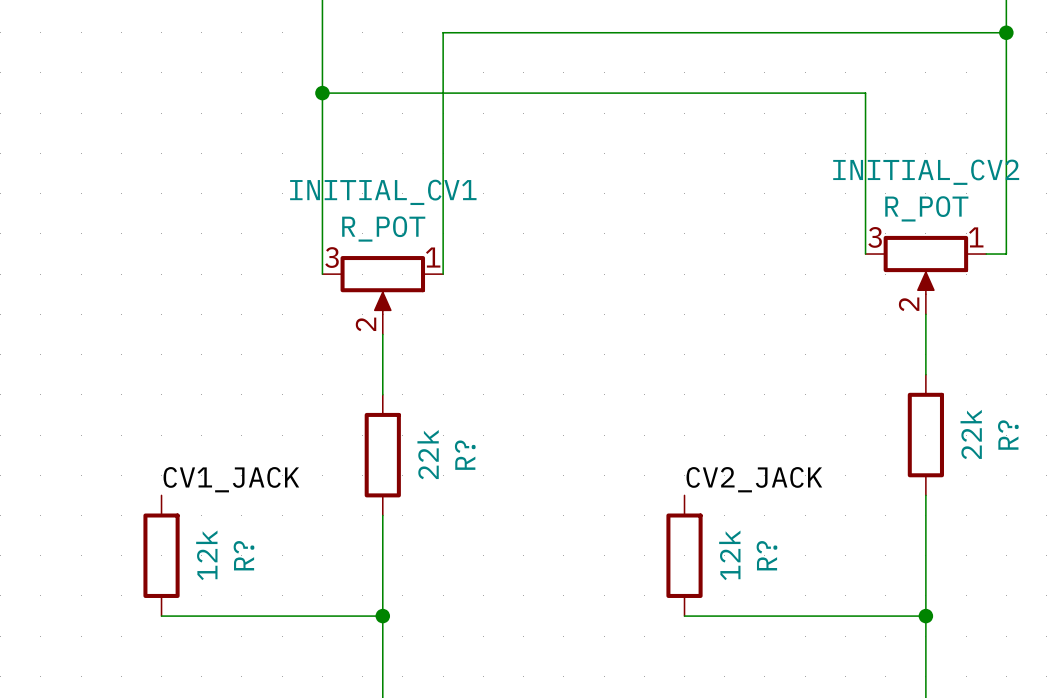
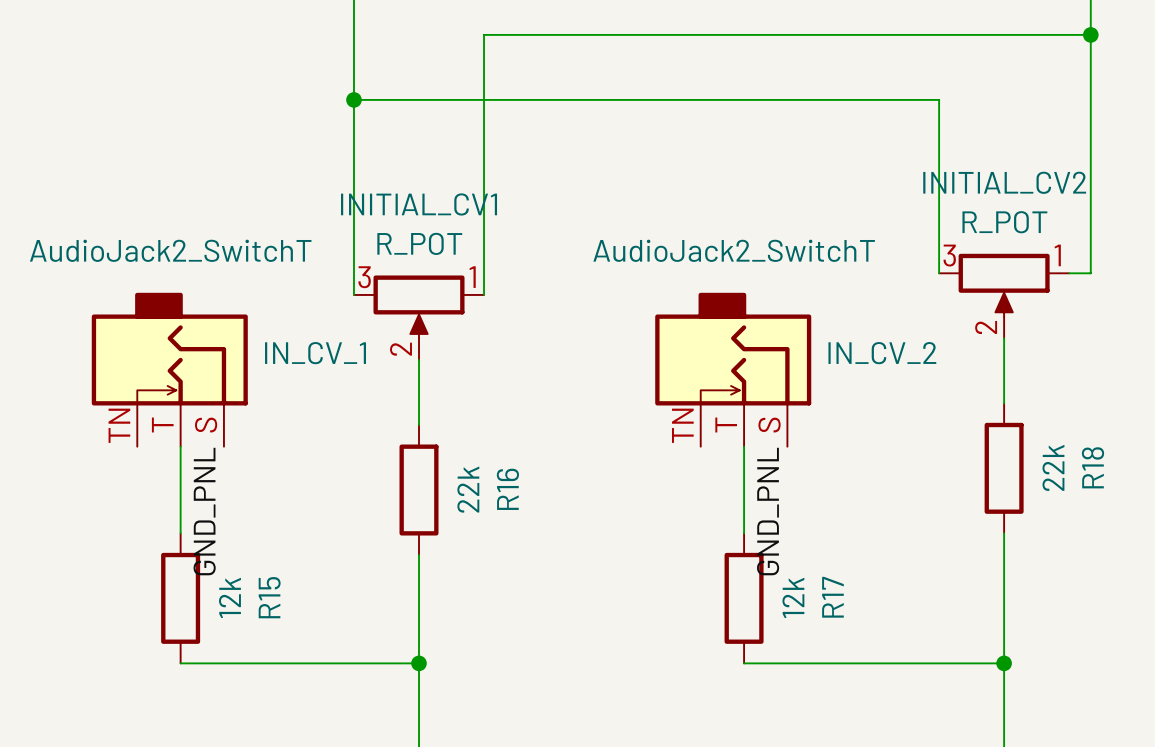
IN_CV_1: none -> AudioJack2_SwitchT (169, 369)
IN_CV_2: none -> AudioJack2_SwitchT (733, 369)
wire: none -> (180, 446) (180, 533)
wire: none -> (744, 446) (744, 533)
R? name: R? (1008, 435) -> R18 (1092, 467)
R? name: R? (465, 455) -> R16 (507, 489)
label: none -> GND_PNL (204, 511)
label: none -> GND_PNL (768, 511)
label: CV1_JACK (231, 479) -> none
label: CV2_JACK (754, 479) -> none
R? name: R? (244, 555) -> R15 (269, 597)
R? name: R? (766, 555) -> R17 (832, 597)

